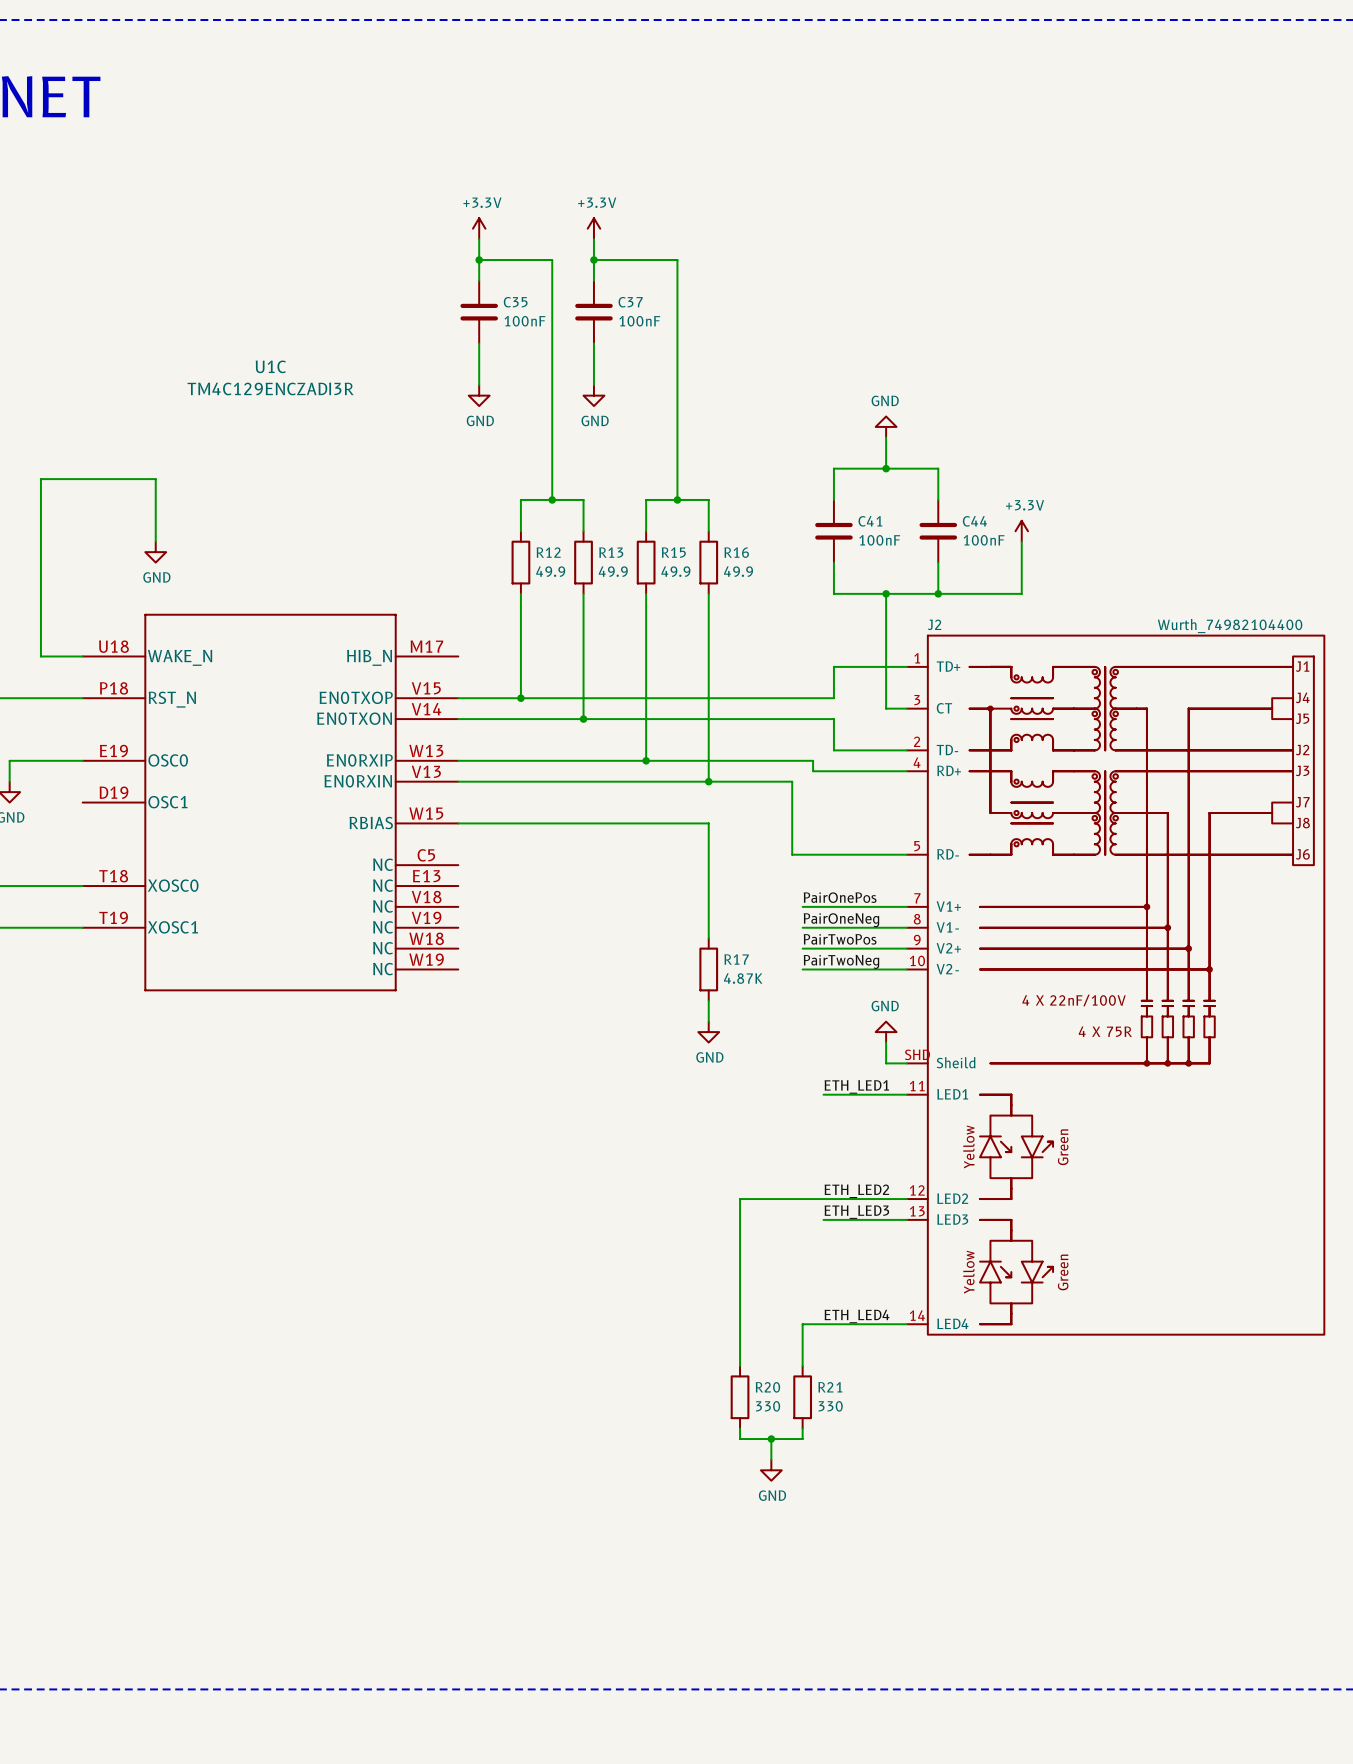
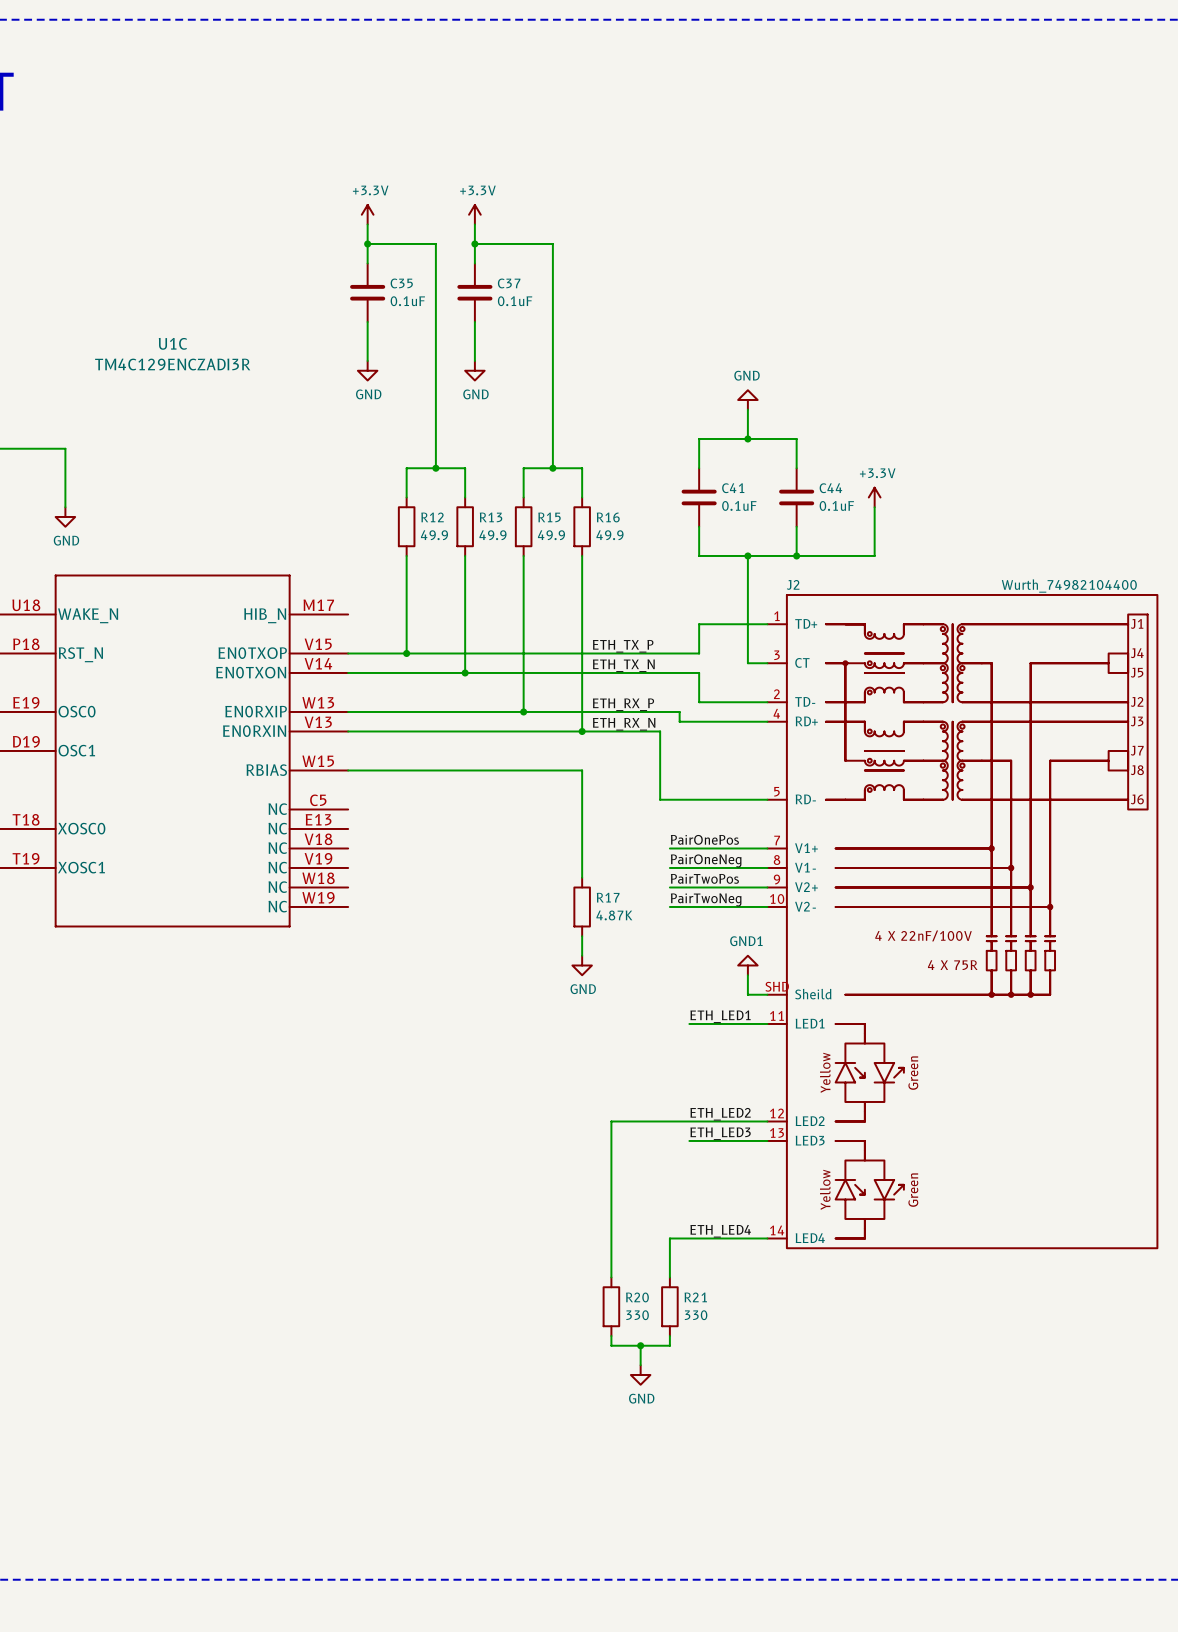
C35 value: 100nF (524, 321) -> 0.1uF (407, 301)
C37 value: 100nF (639, 321) -> 0.1uF (515, 301)
C41 value: 100nF (879, 540) -> 0.1uF (739, 505)
C44 value: 100nF (984, 540) -> 0.1uF (836, 505)
label: none -> ETH_TX_P (623, 646)
label: none -> ETH_TX_N (623, 665)
label: none -> ETH_RX_P (623, 704)
label: none -> ETH_RX_N (624, 724)
power symbol: GND (886, 1032) -> GND1 (747, 965)

